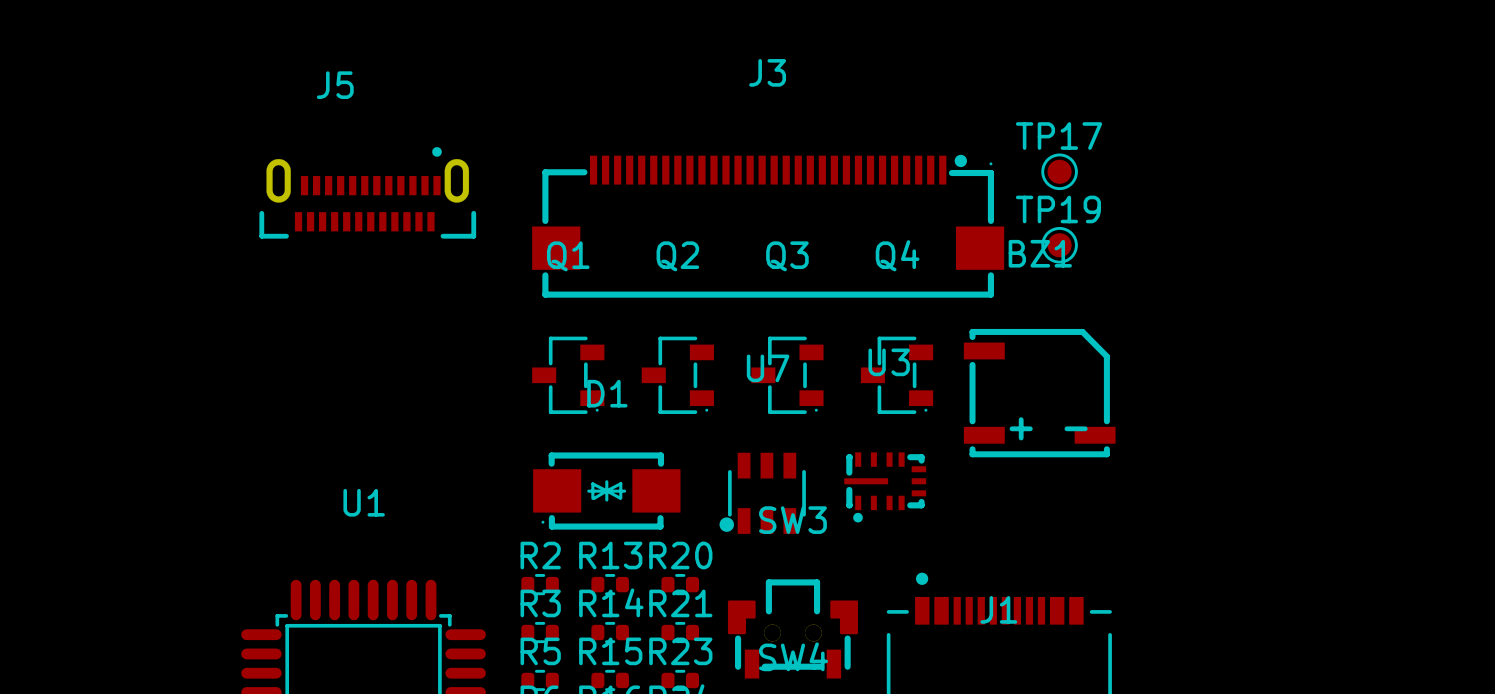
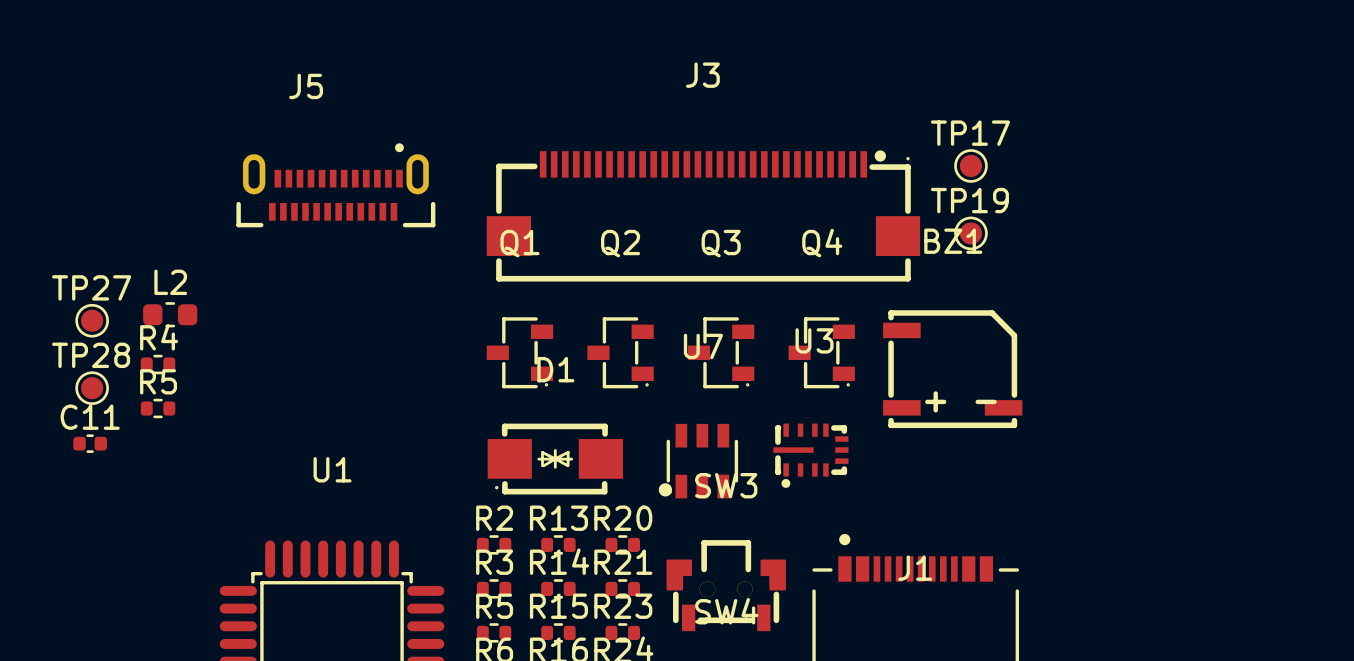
L2: none -> (170, 314)
TP27: none -> (92, 320)
R4: none -> (158, 364)
TP28: none -> (92, 388)
R5: none -> (158, 408)
C11: none -> (90, 443)

